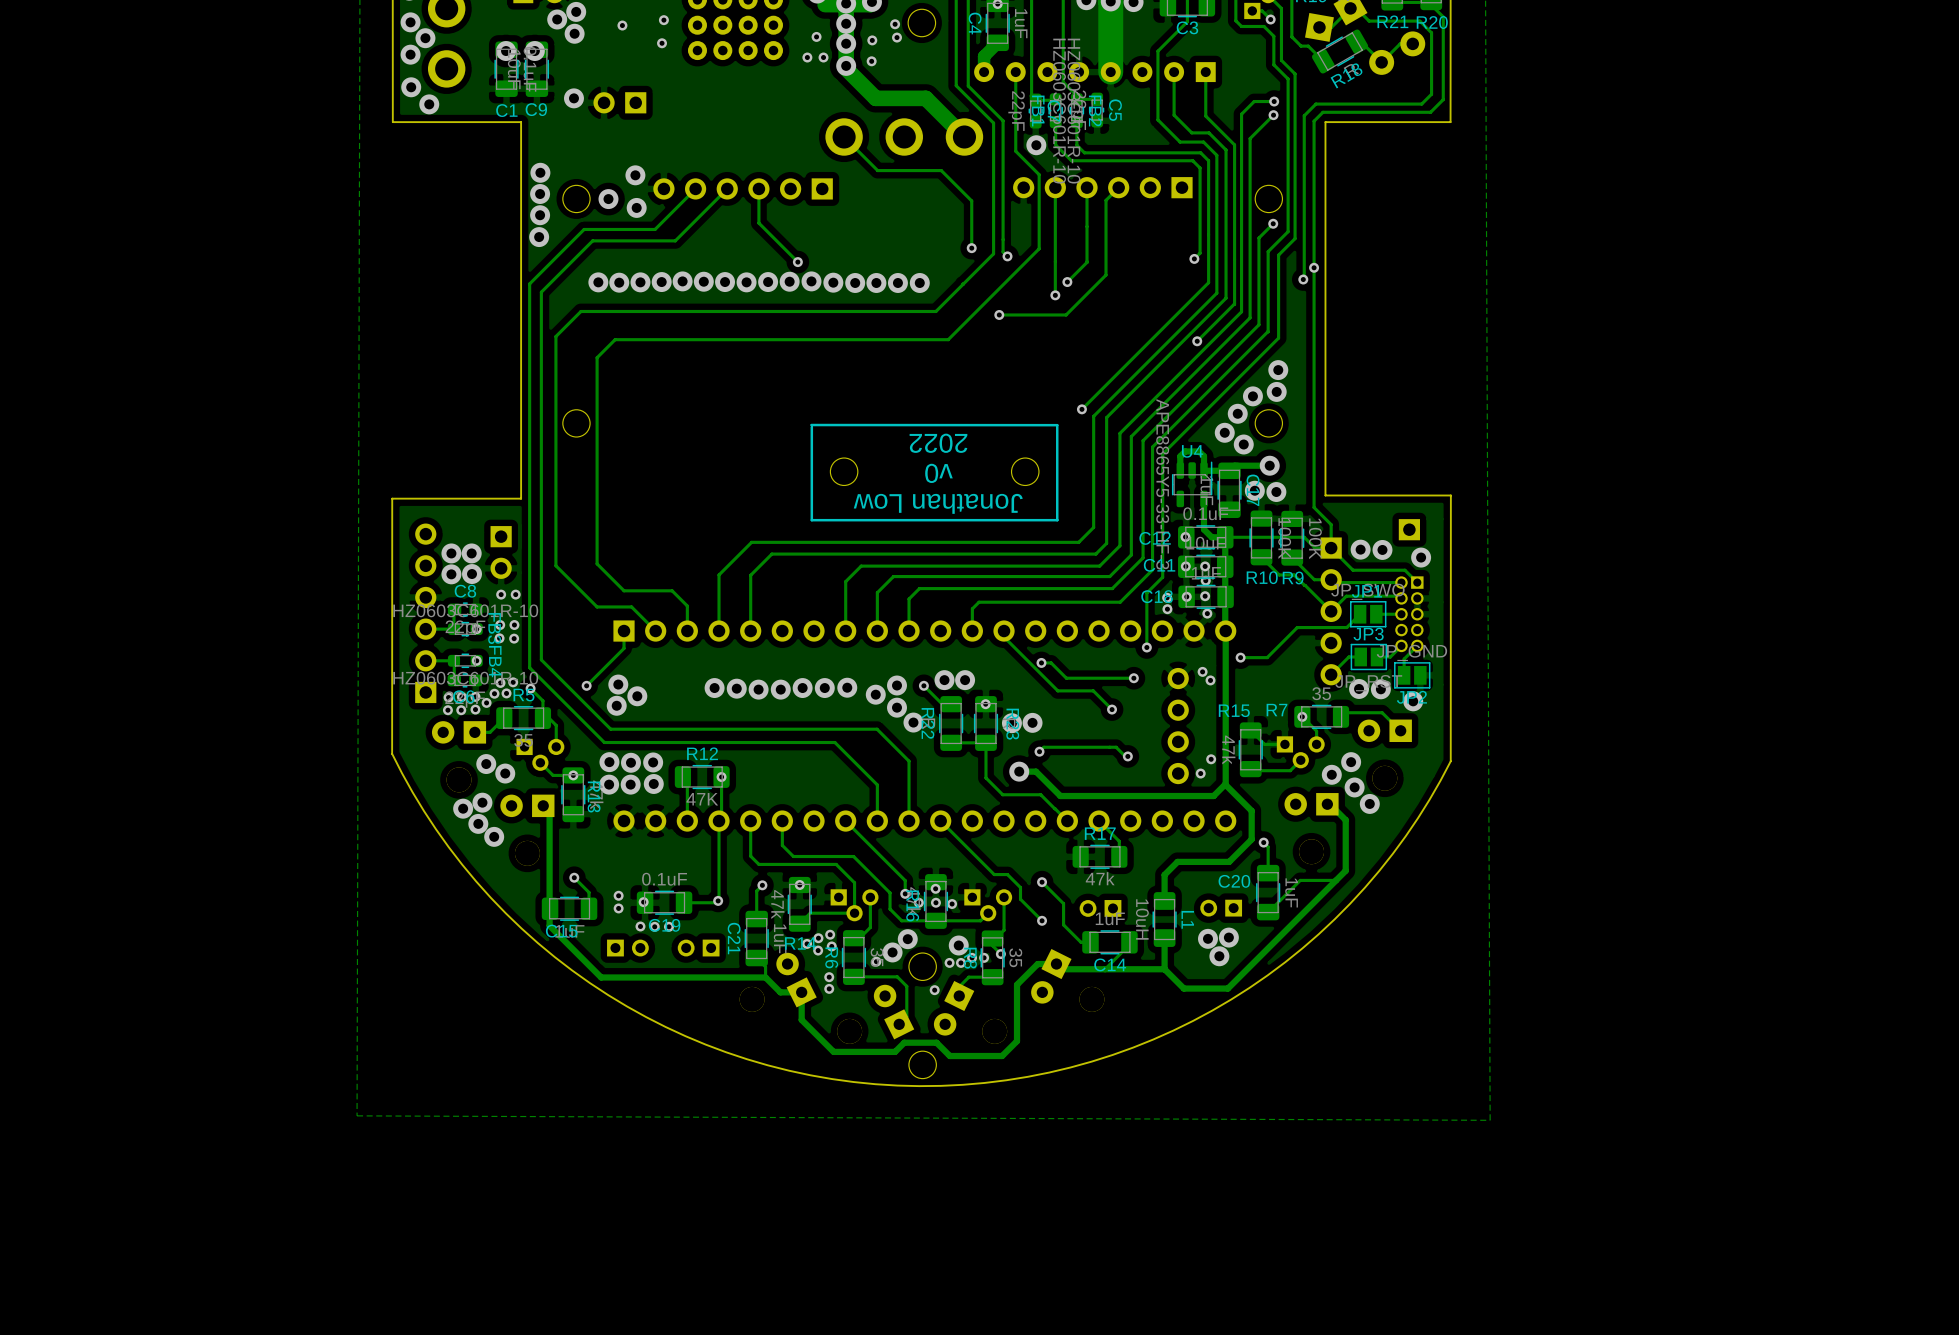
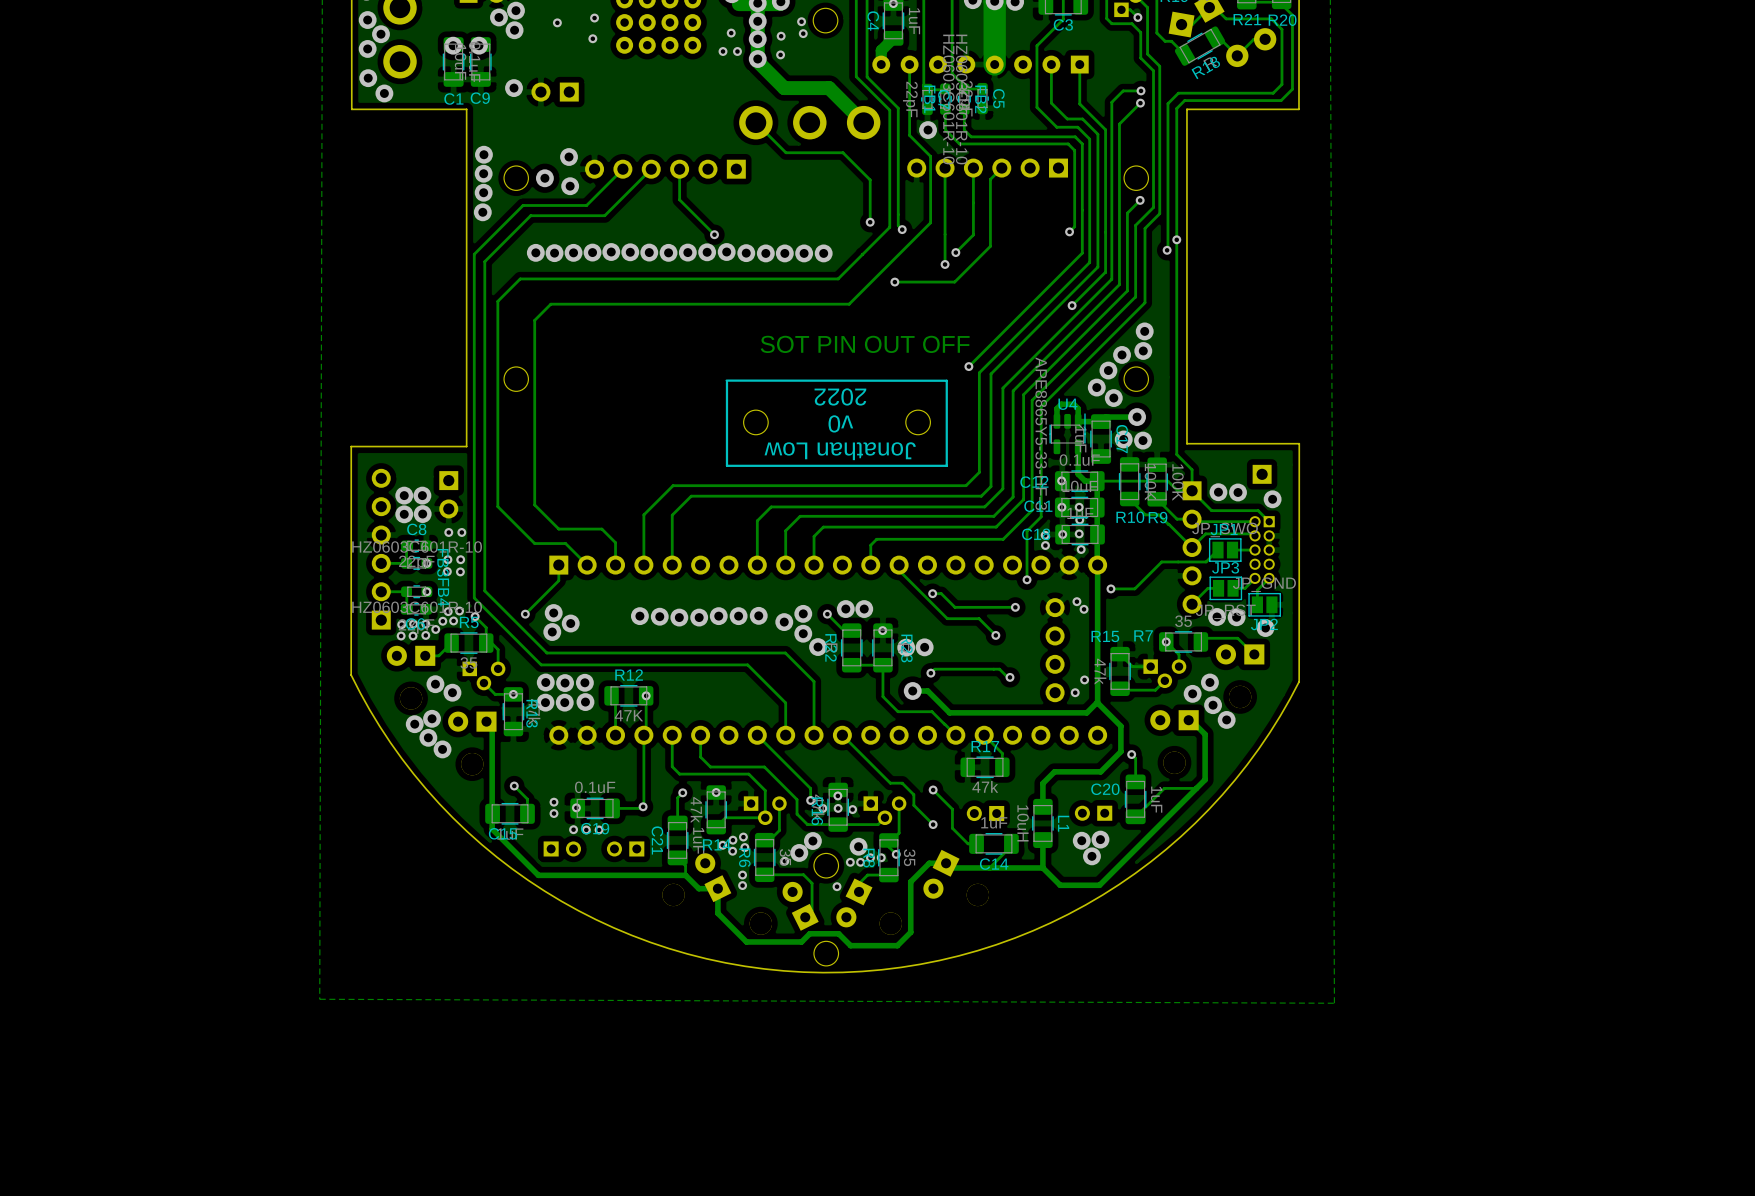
text: none -> SOT PIN OUT OFF (865, 344)

